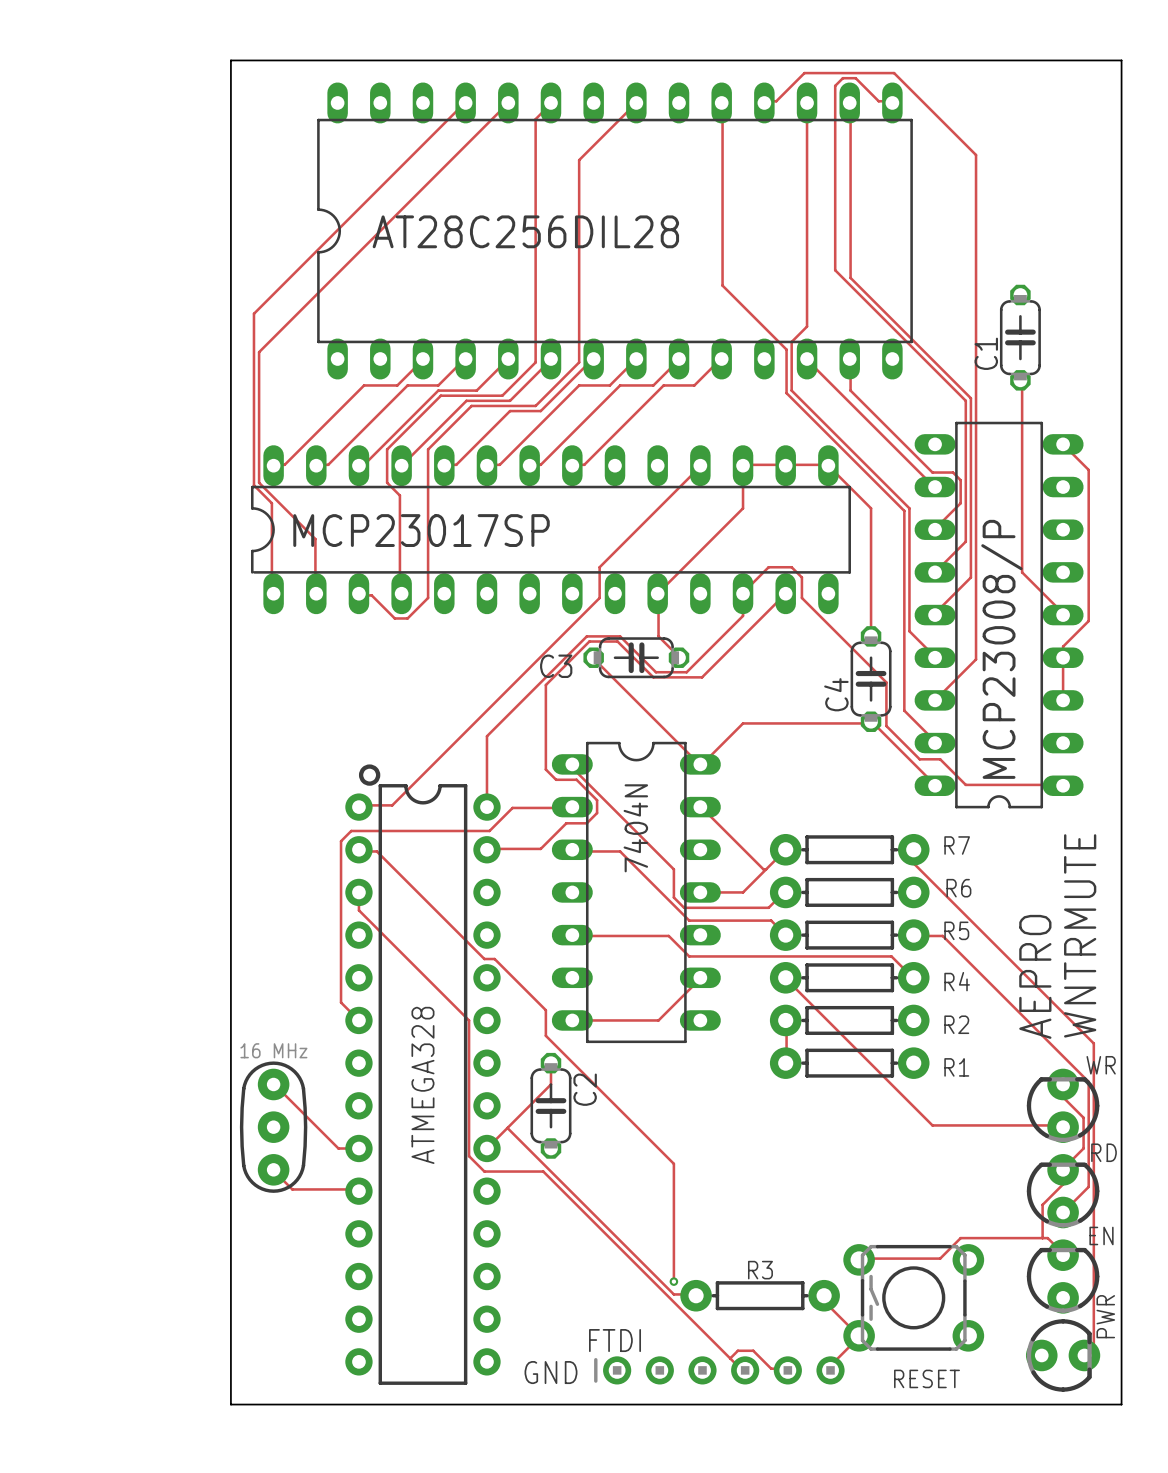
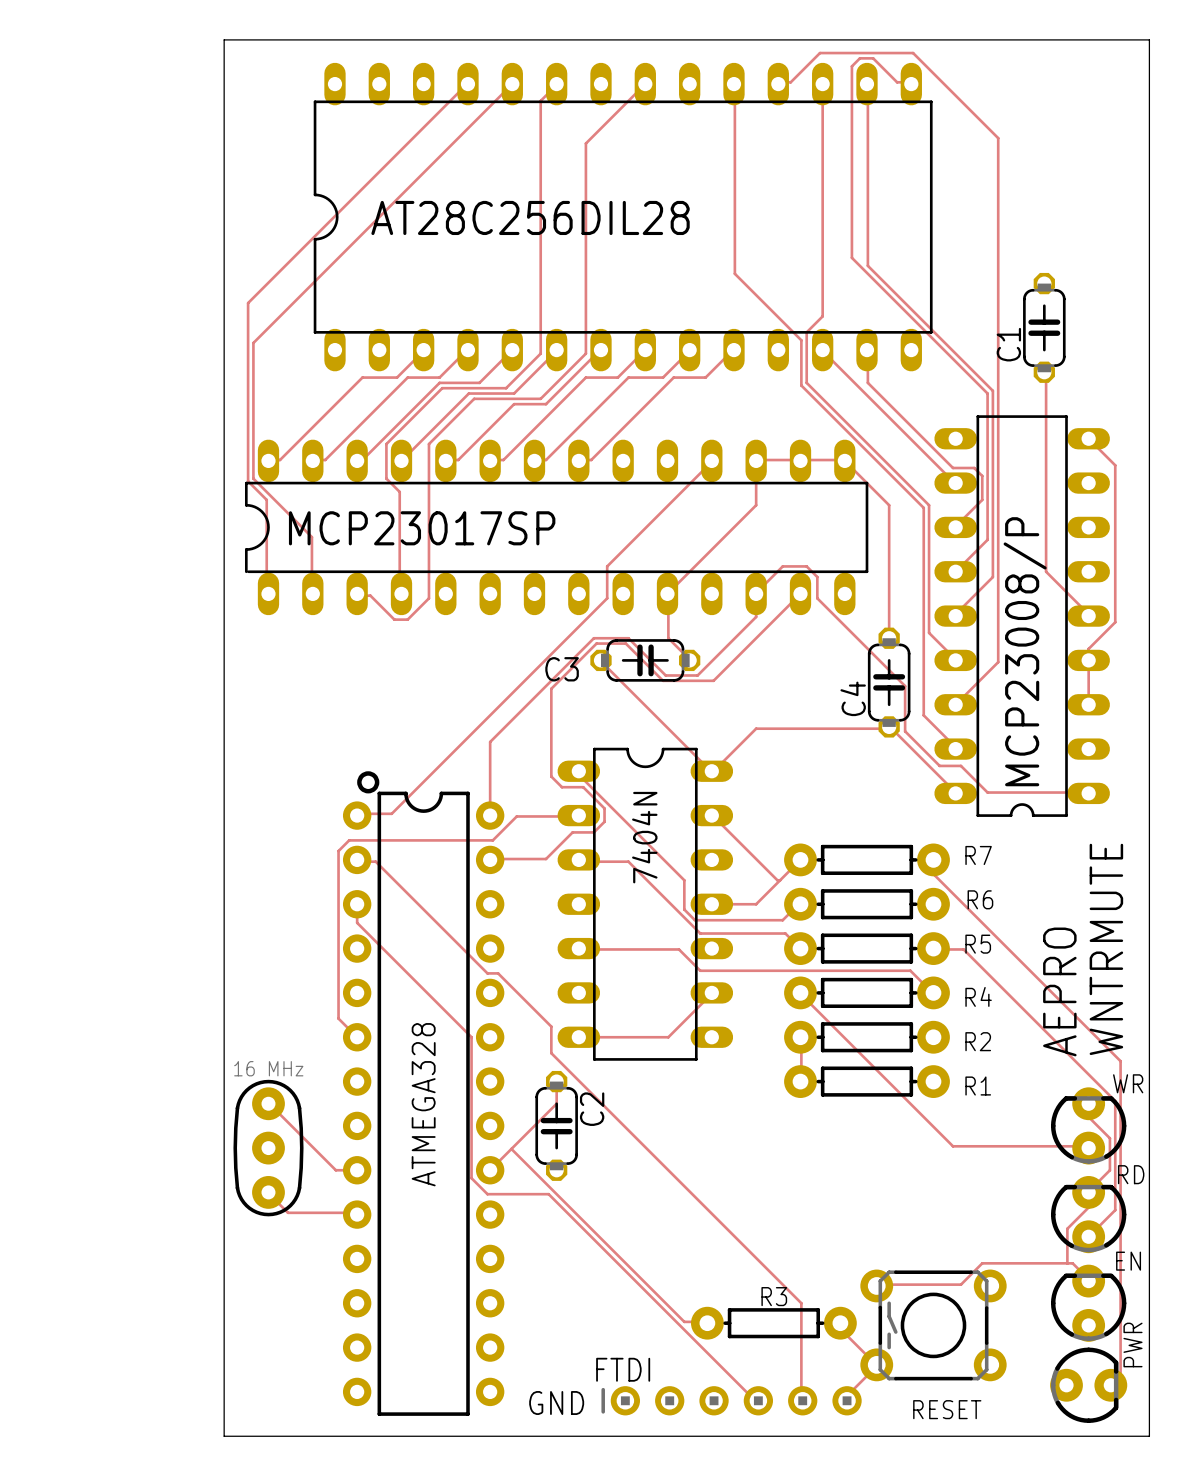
track: (673, 1163) (673, 1281) -> (684, 1186) (801, 1303) (801, 1399)
via: (673, 1281) -> none
track: (730, 1358) (737, 1350) (753, 1350) (771, 1368) (786, 1368) -> none

